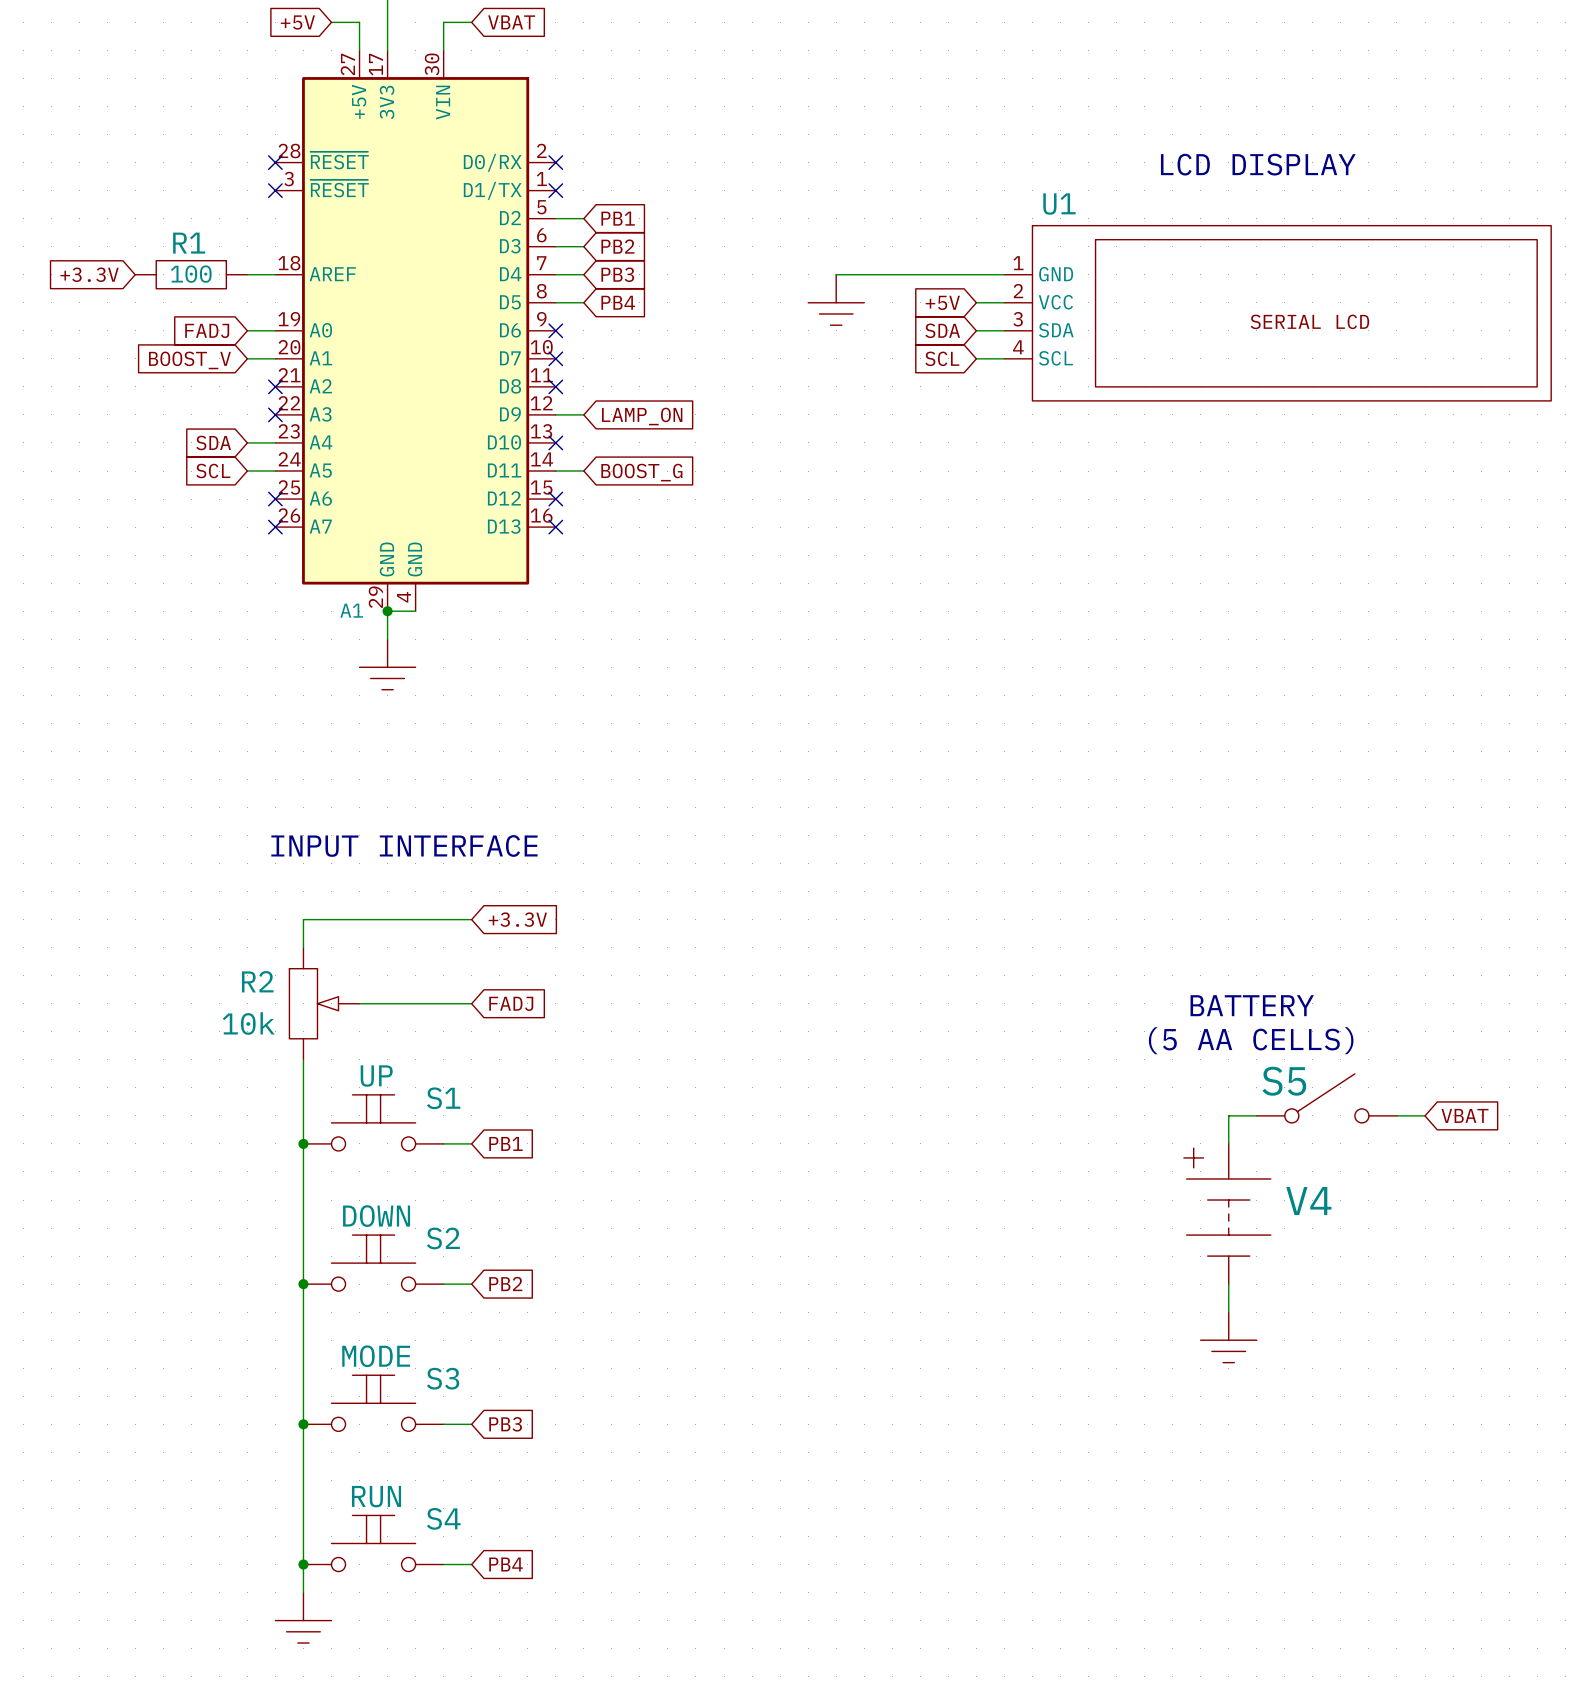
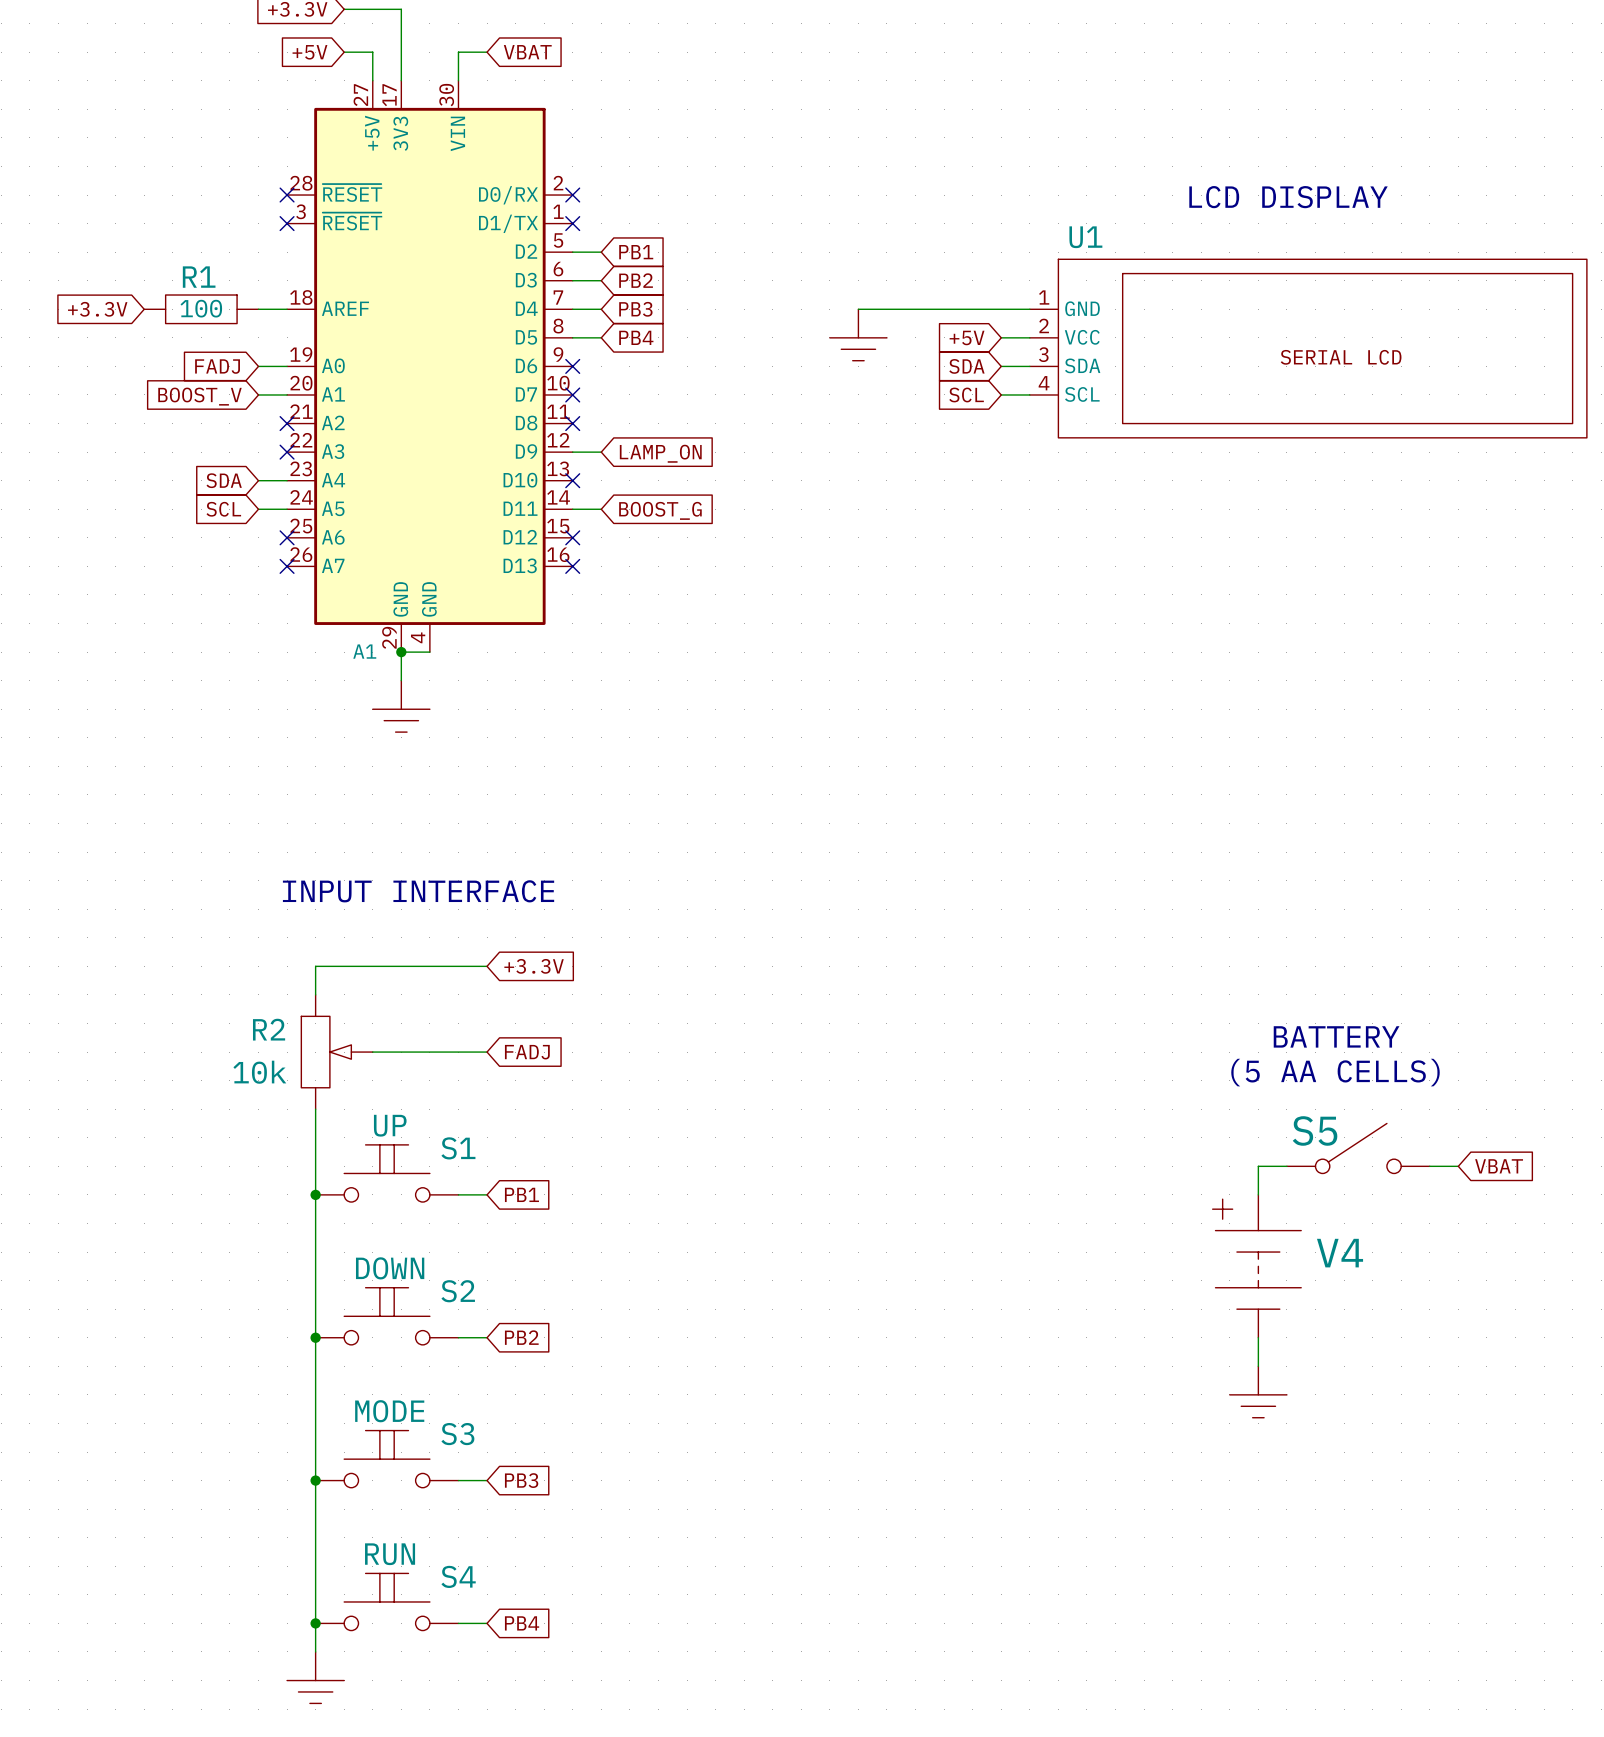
text position: BATTERY (1252, 1005) -> BATTERY (1336, 1036)
text position: (5 AA CELLS) (1251, 1040) -> (5 AA CELLS) (1335, 1072)

